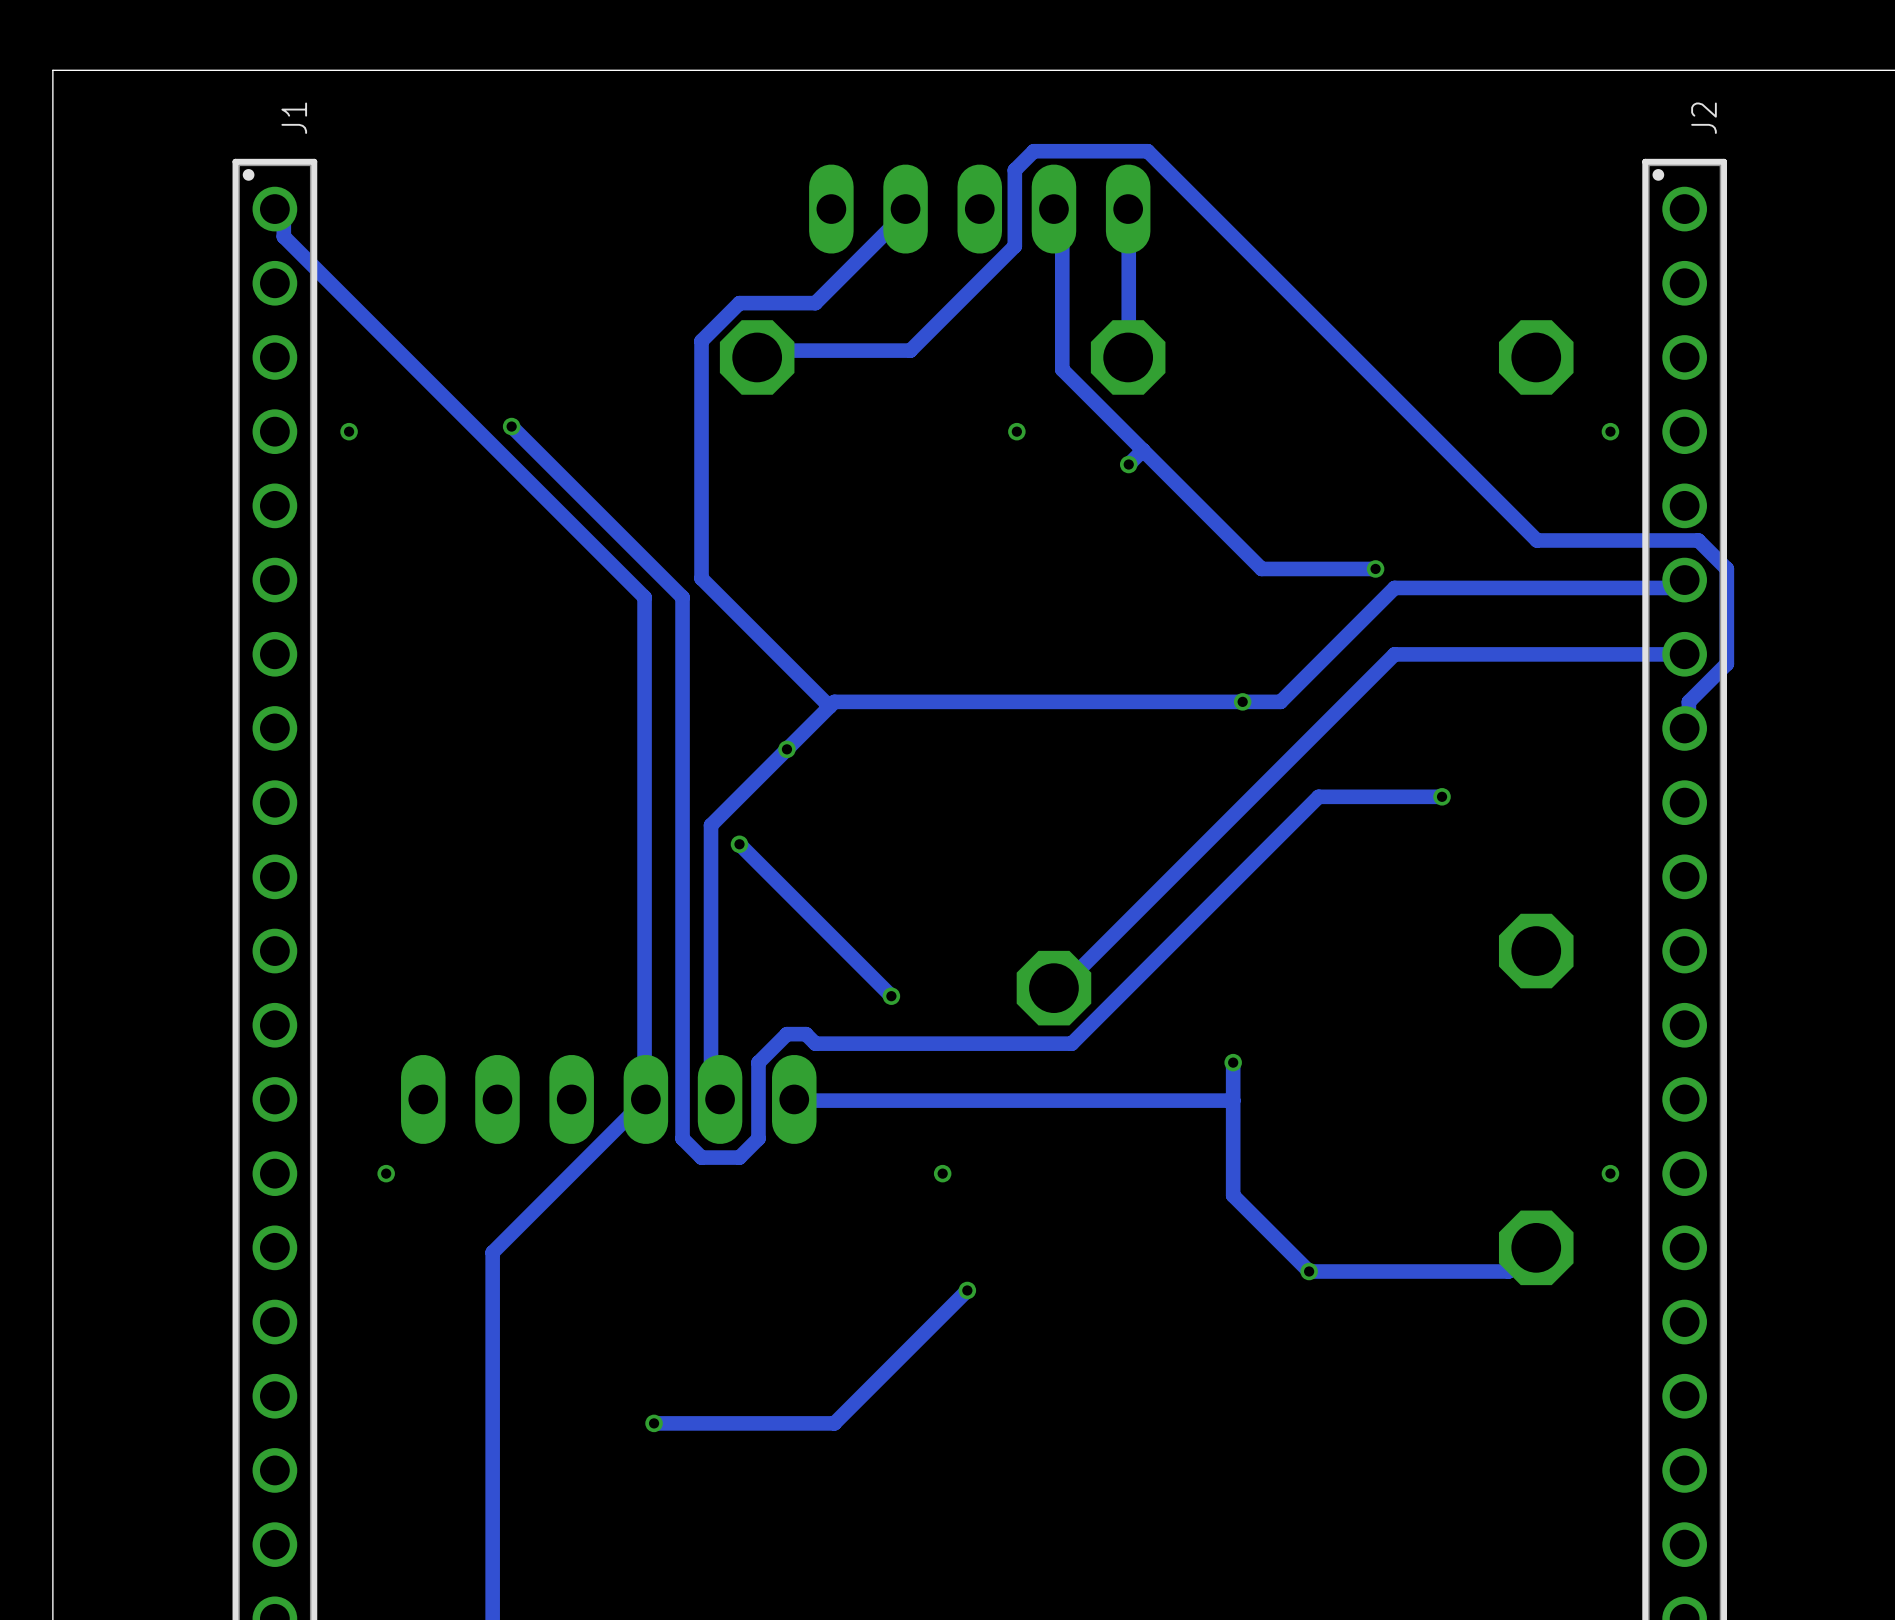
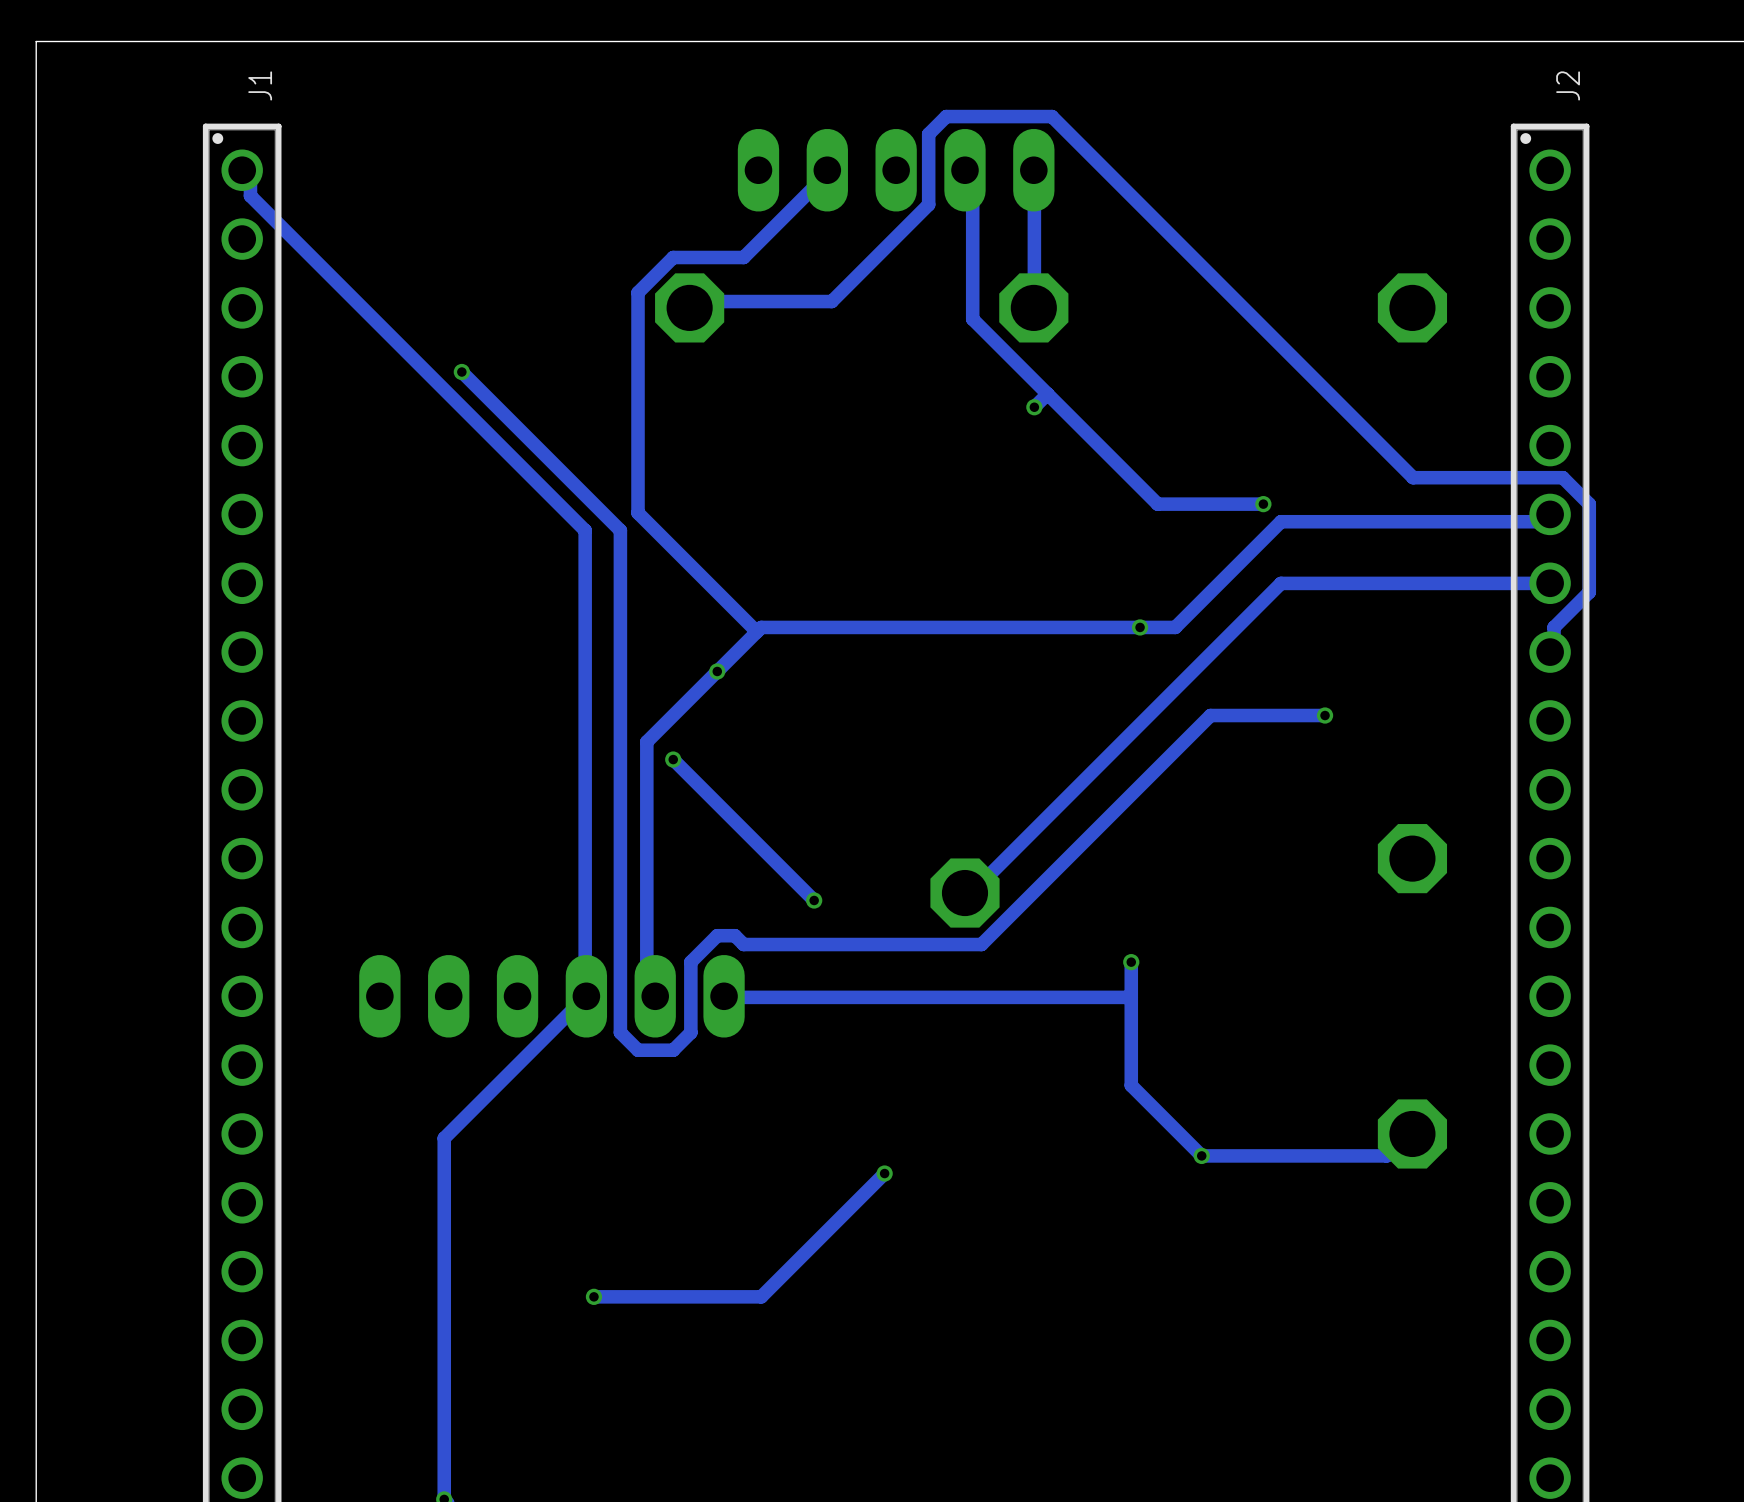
via: (349, 431) -> none
via: (1016, 431) -> none
via: (1610, 431) -> none
via: (386, 1173) -> none
via: (942, 1173) -> none
via: (1610, 1173) -> none

